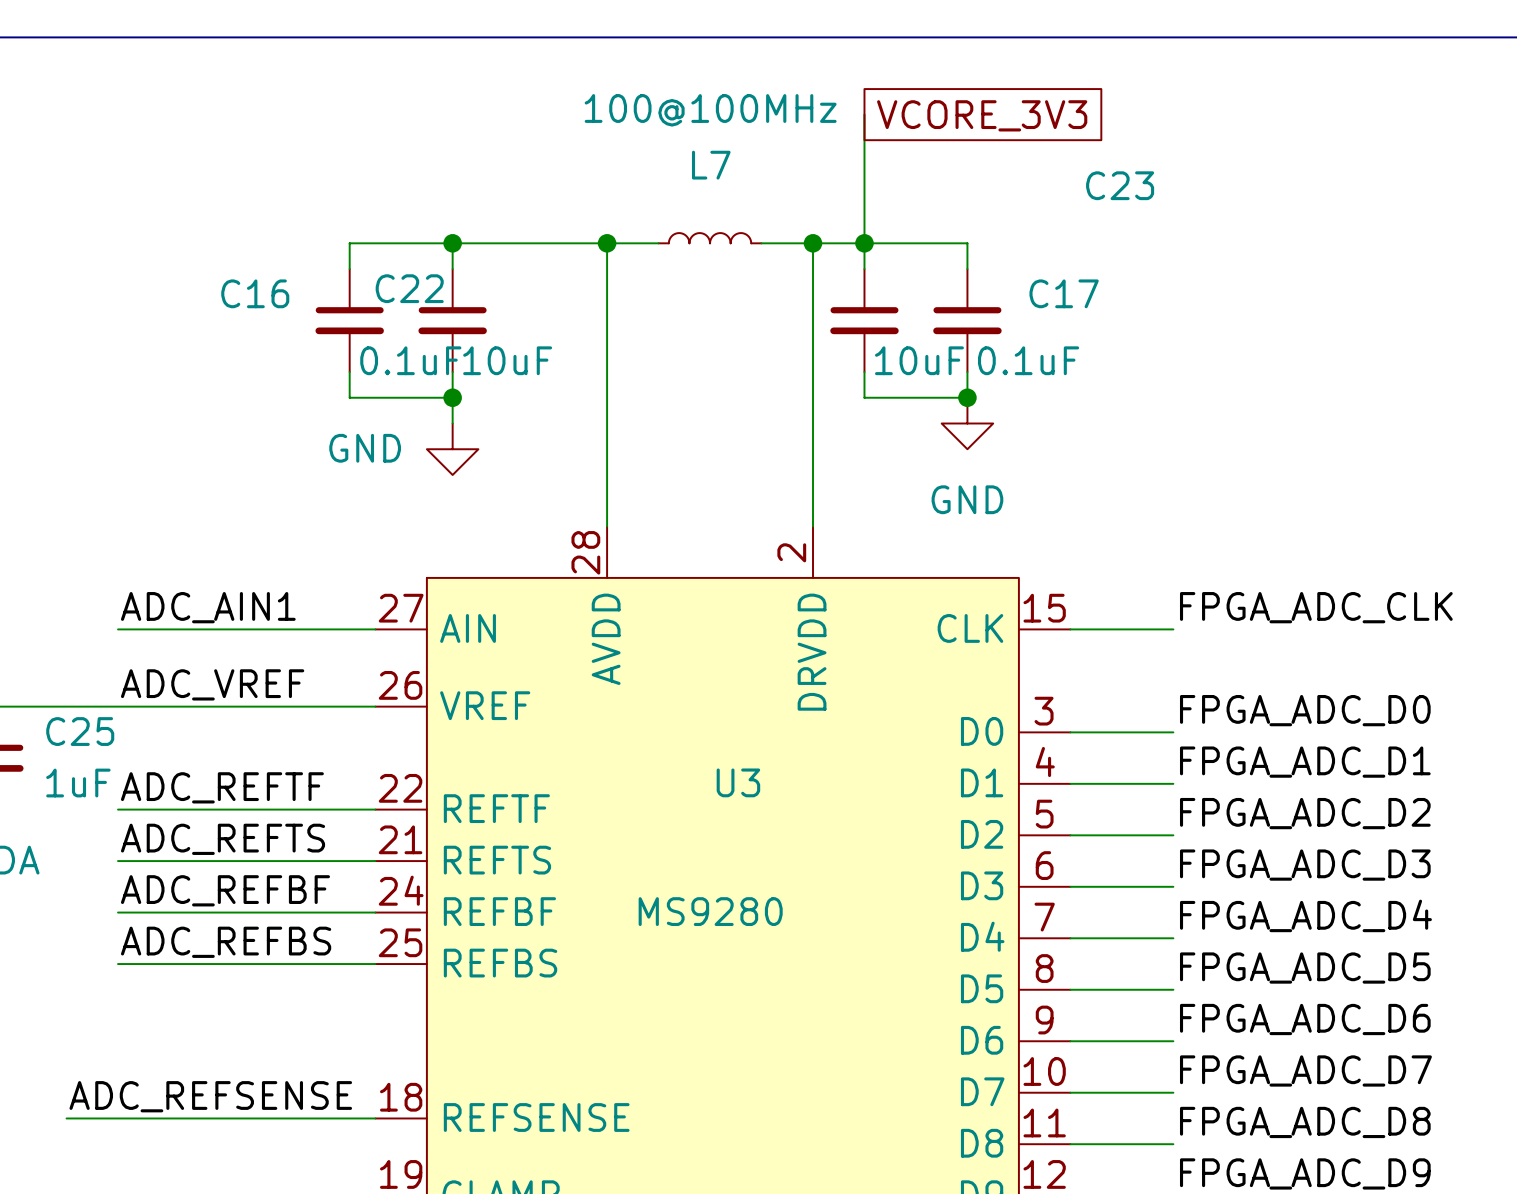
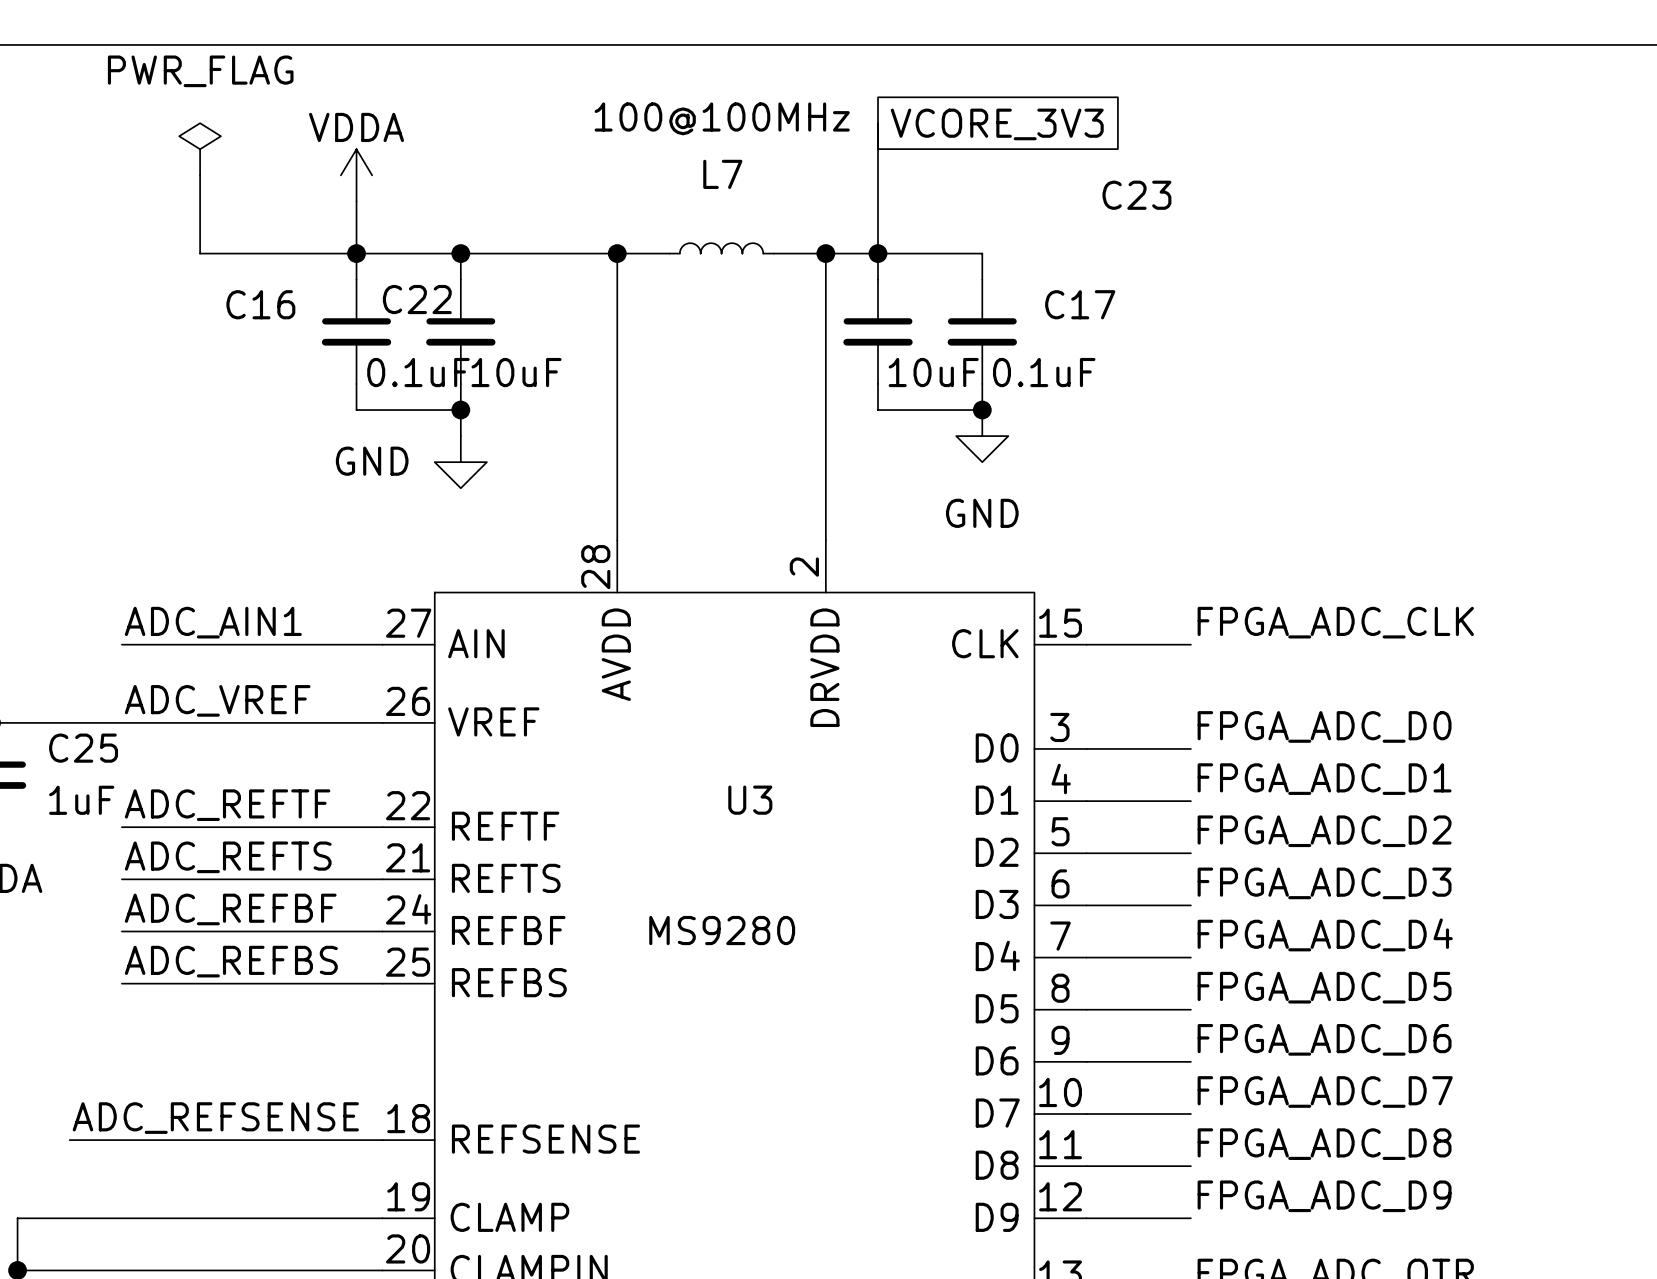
power symbol: none -> PWR_FLAG (200, 149)
wire: none -> (200, 175) (200, 253) (356, 253) (356, 201)
power symbol: none -> VDDA (356, 175)
junction: none -> (356, 253)

